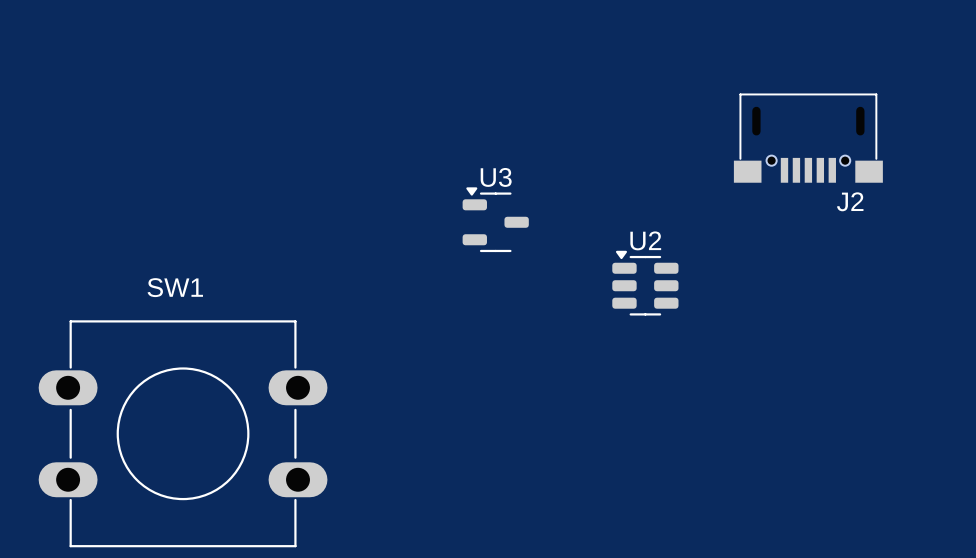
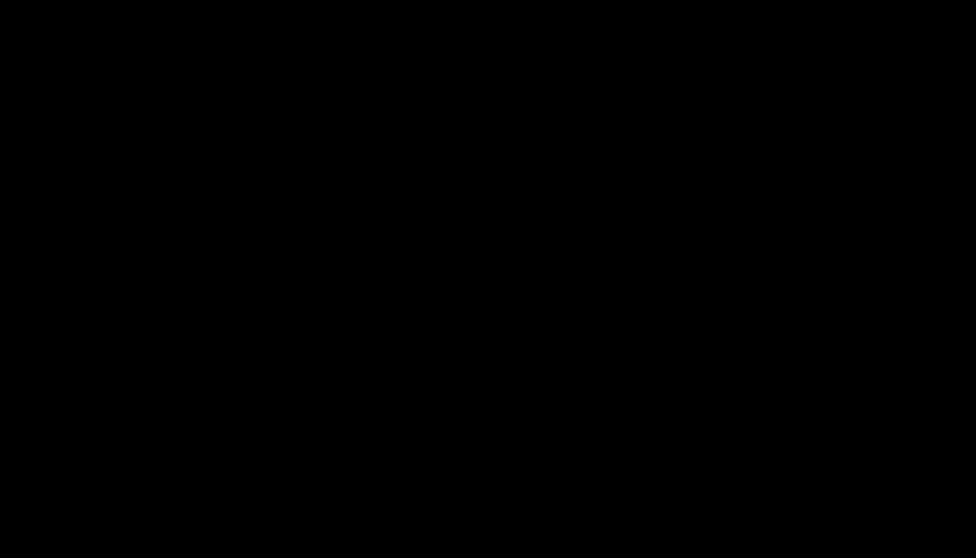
J2: (808, 138) -> none
U3: (495, 219) -> none
U2: (645, 283) -> none
SW1: (183, 433) -> none

